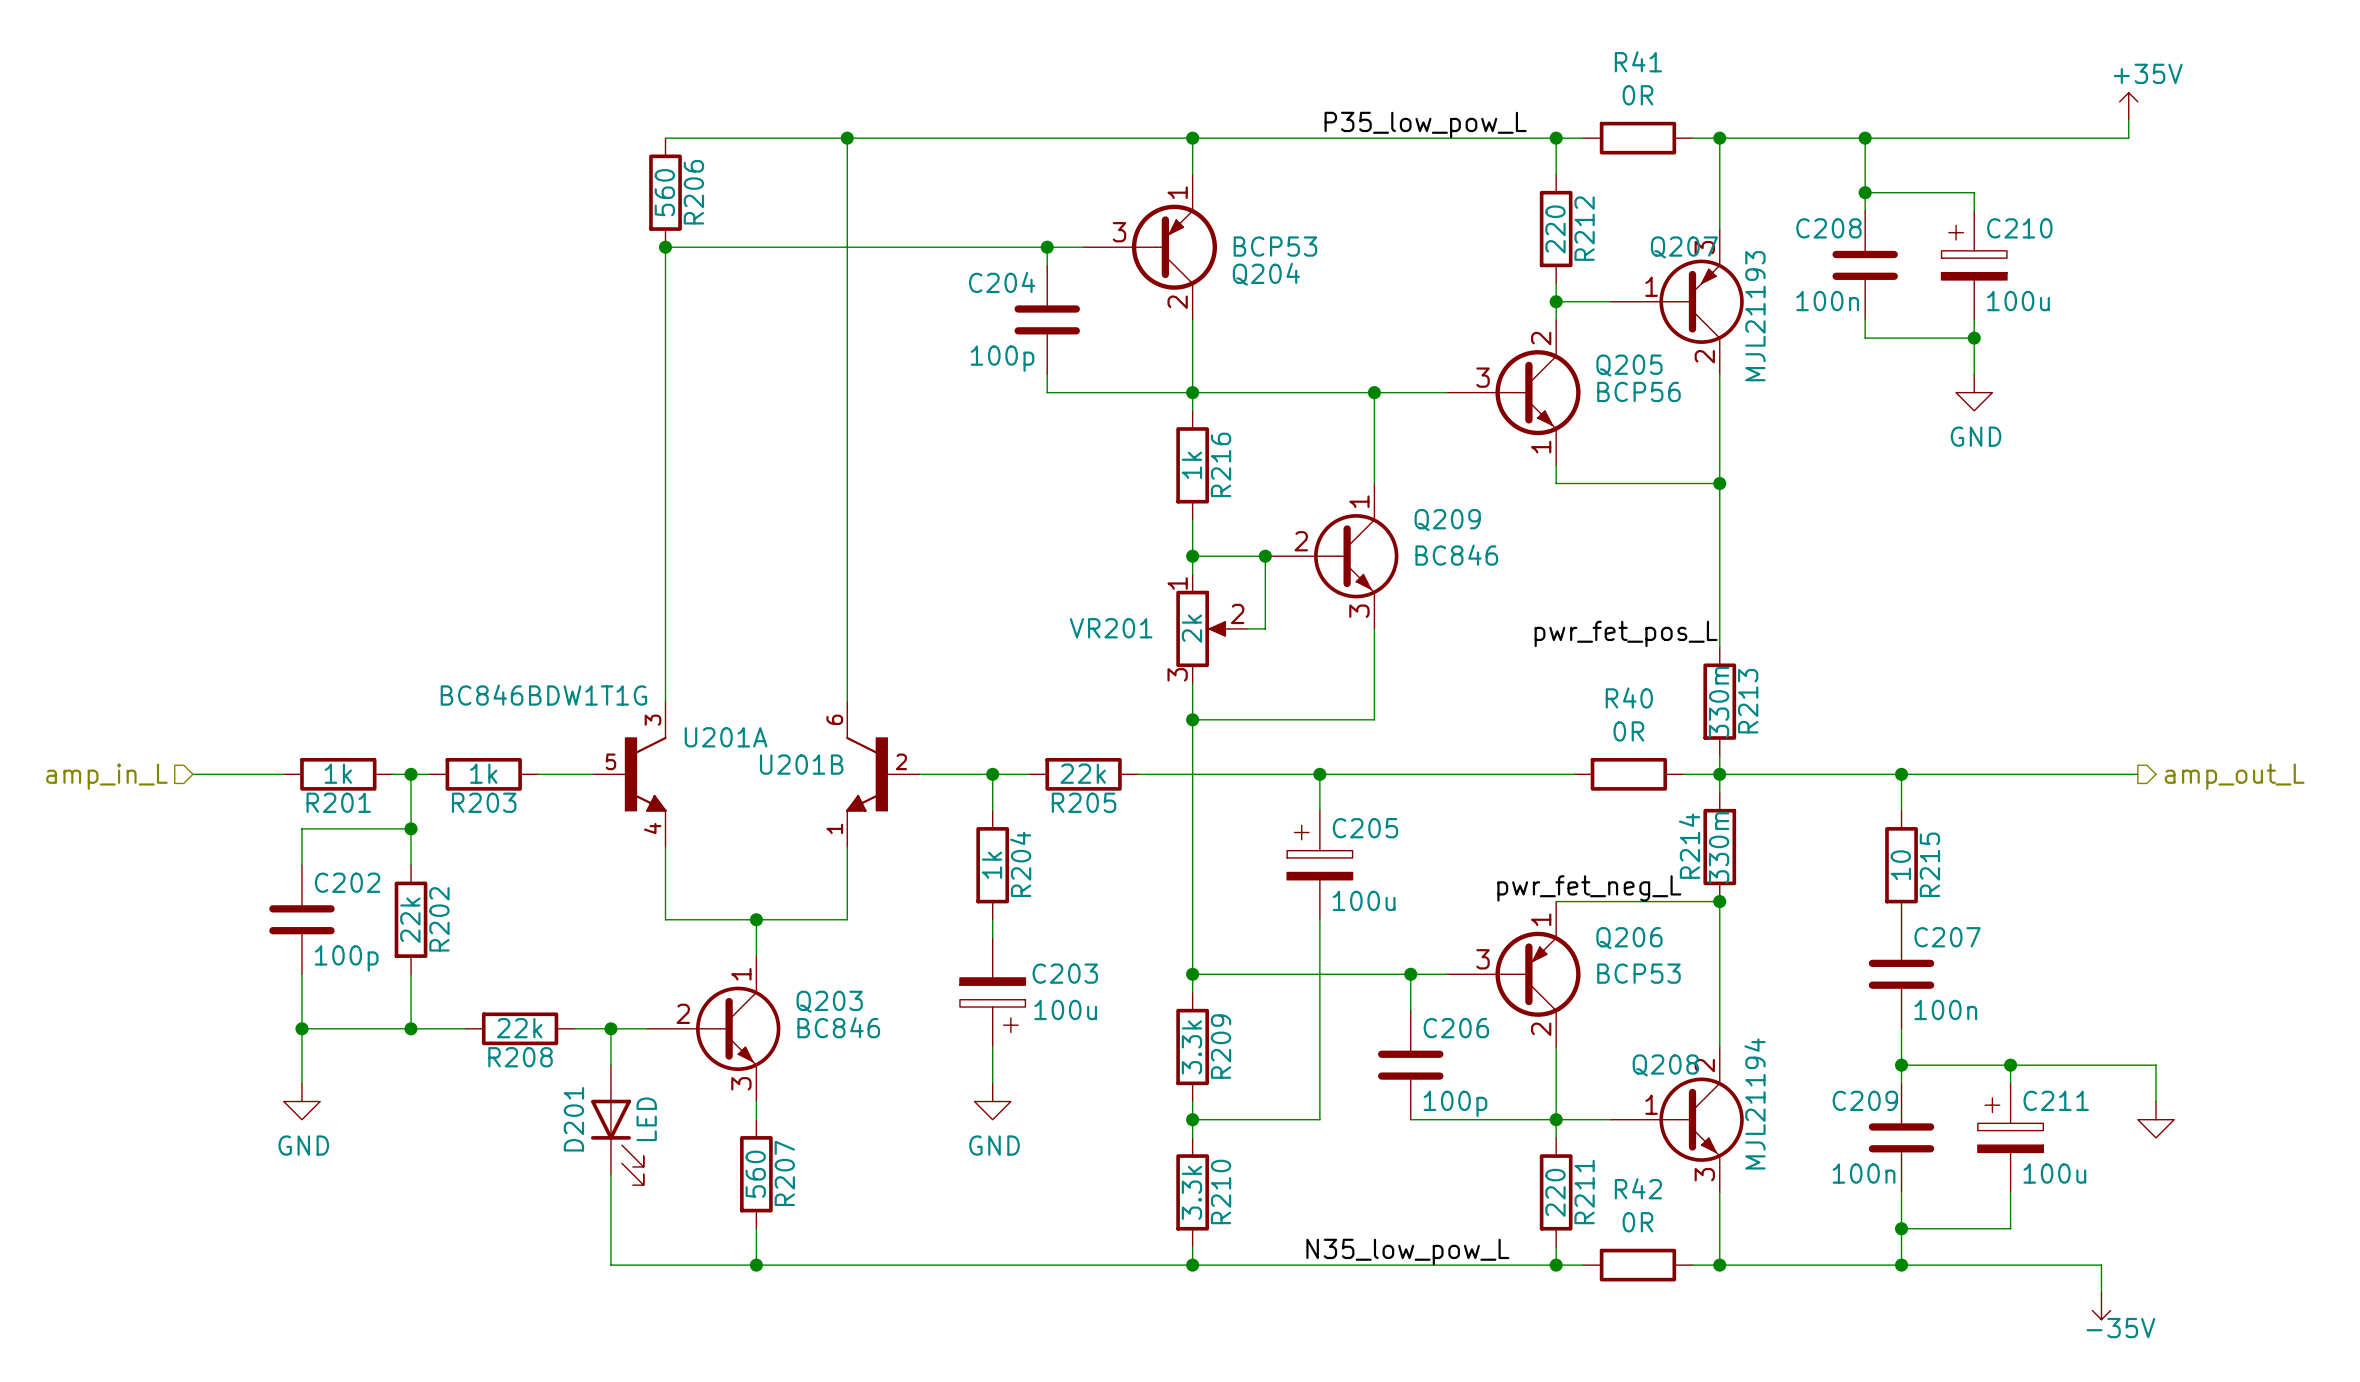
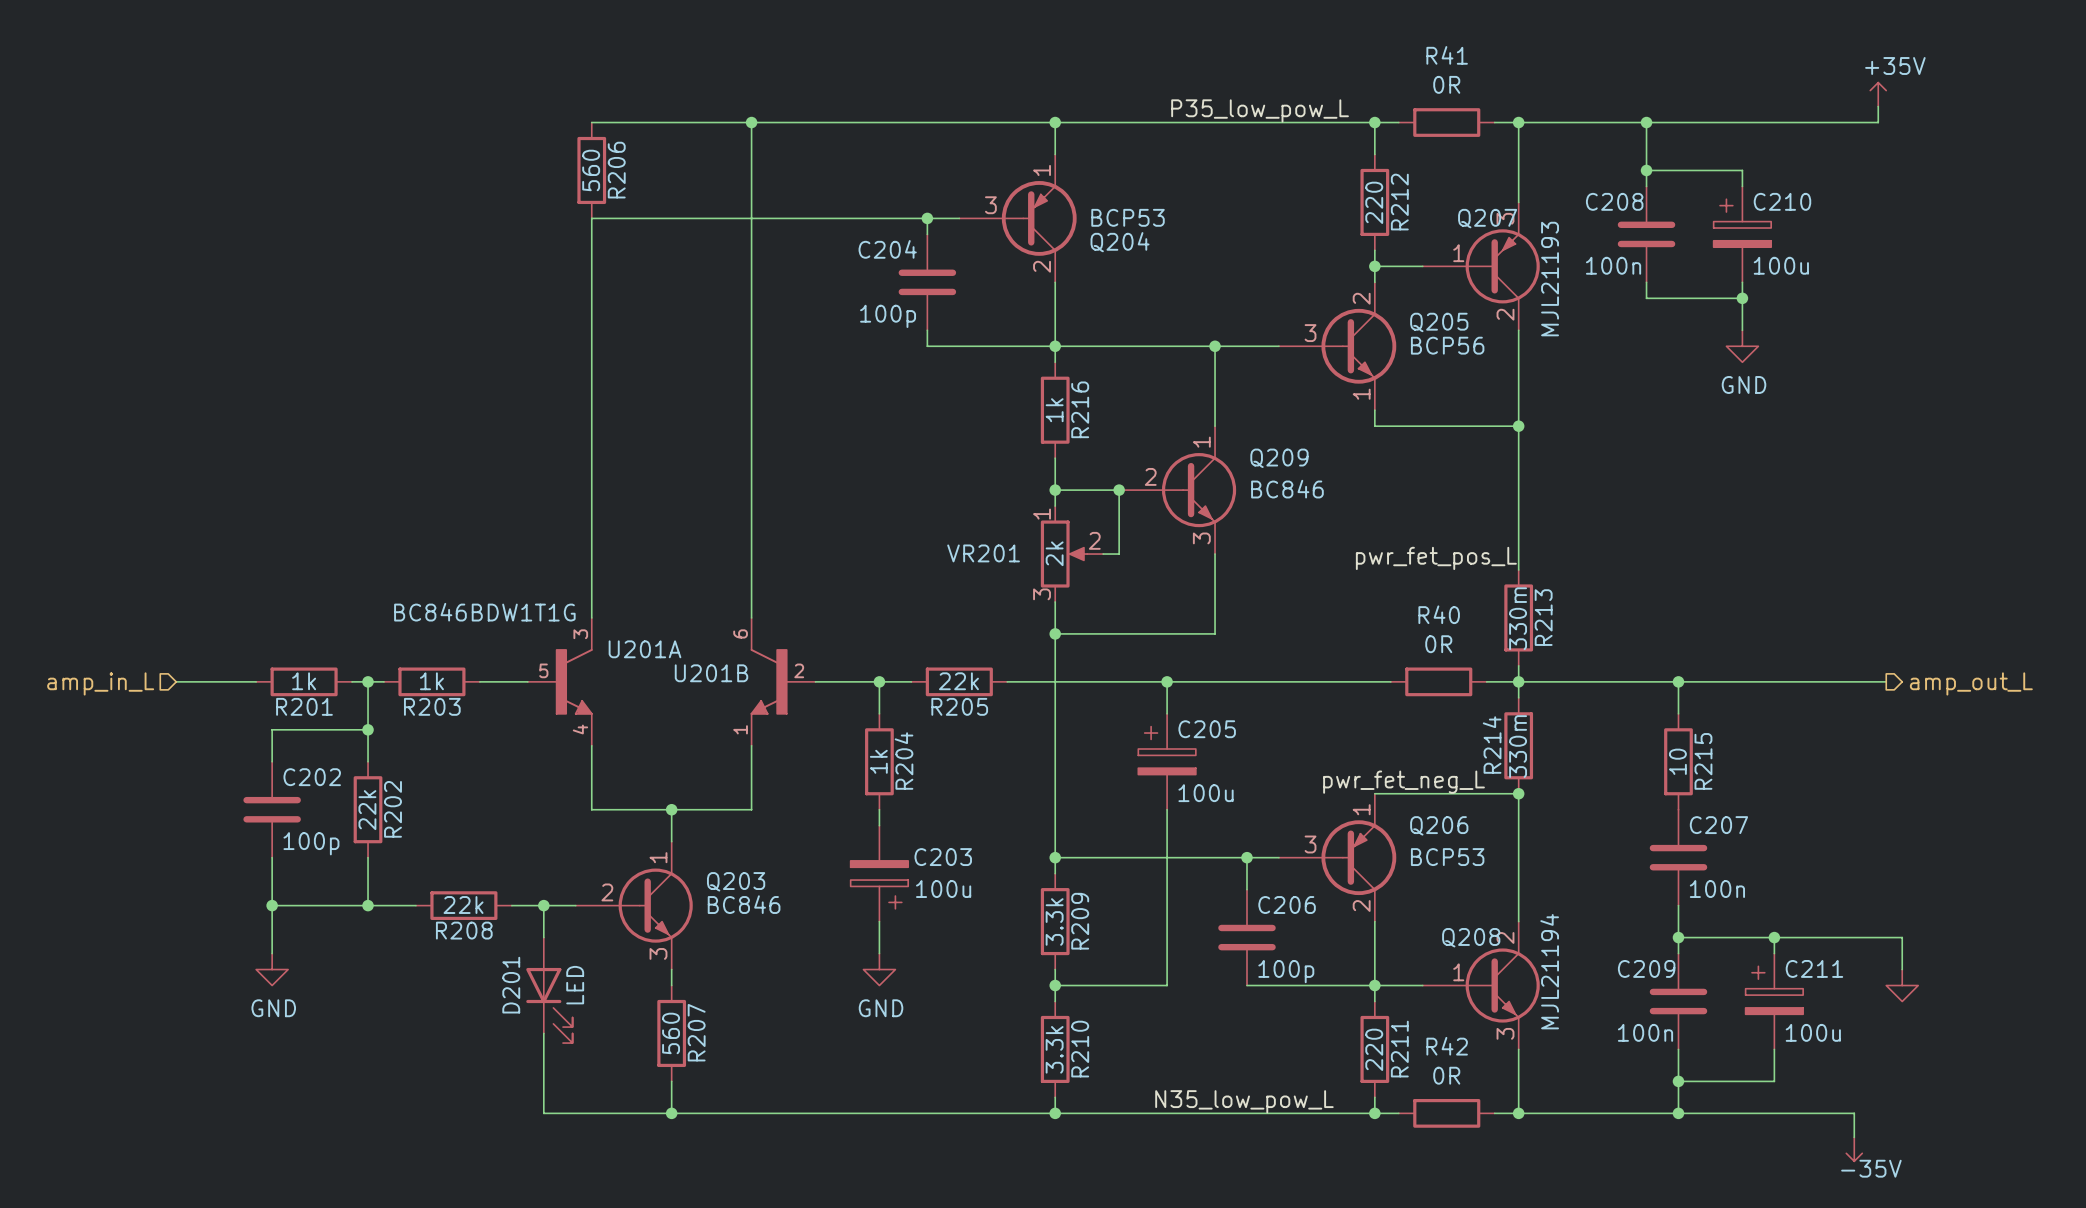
junction: (665, 247) -> none

